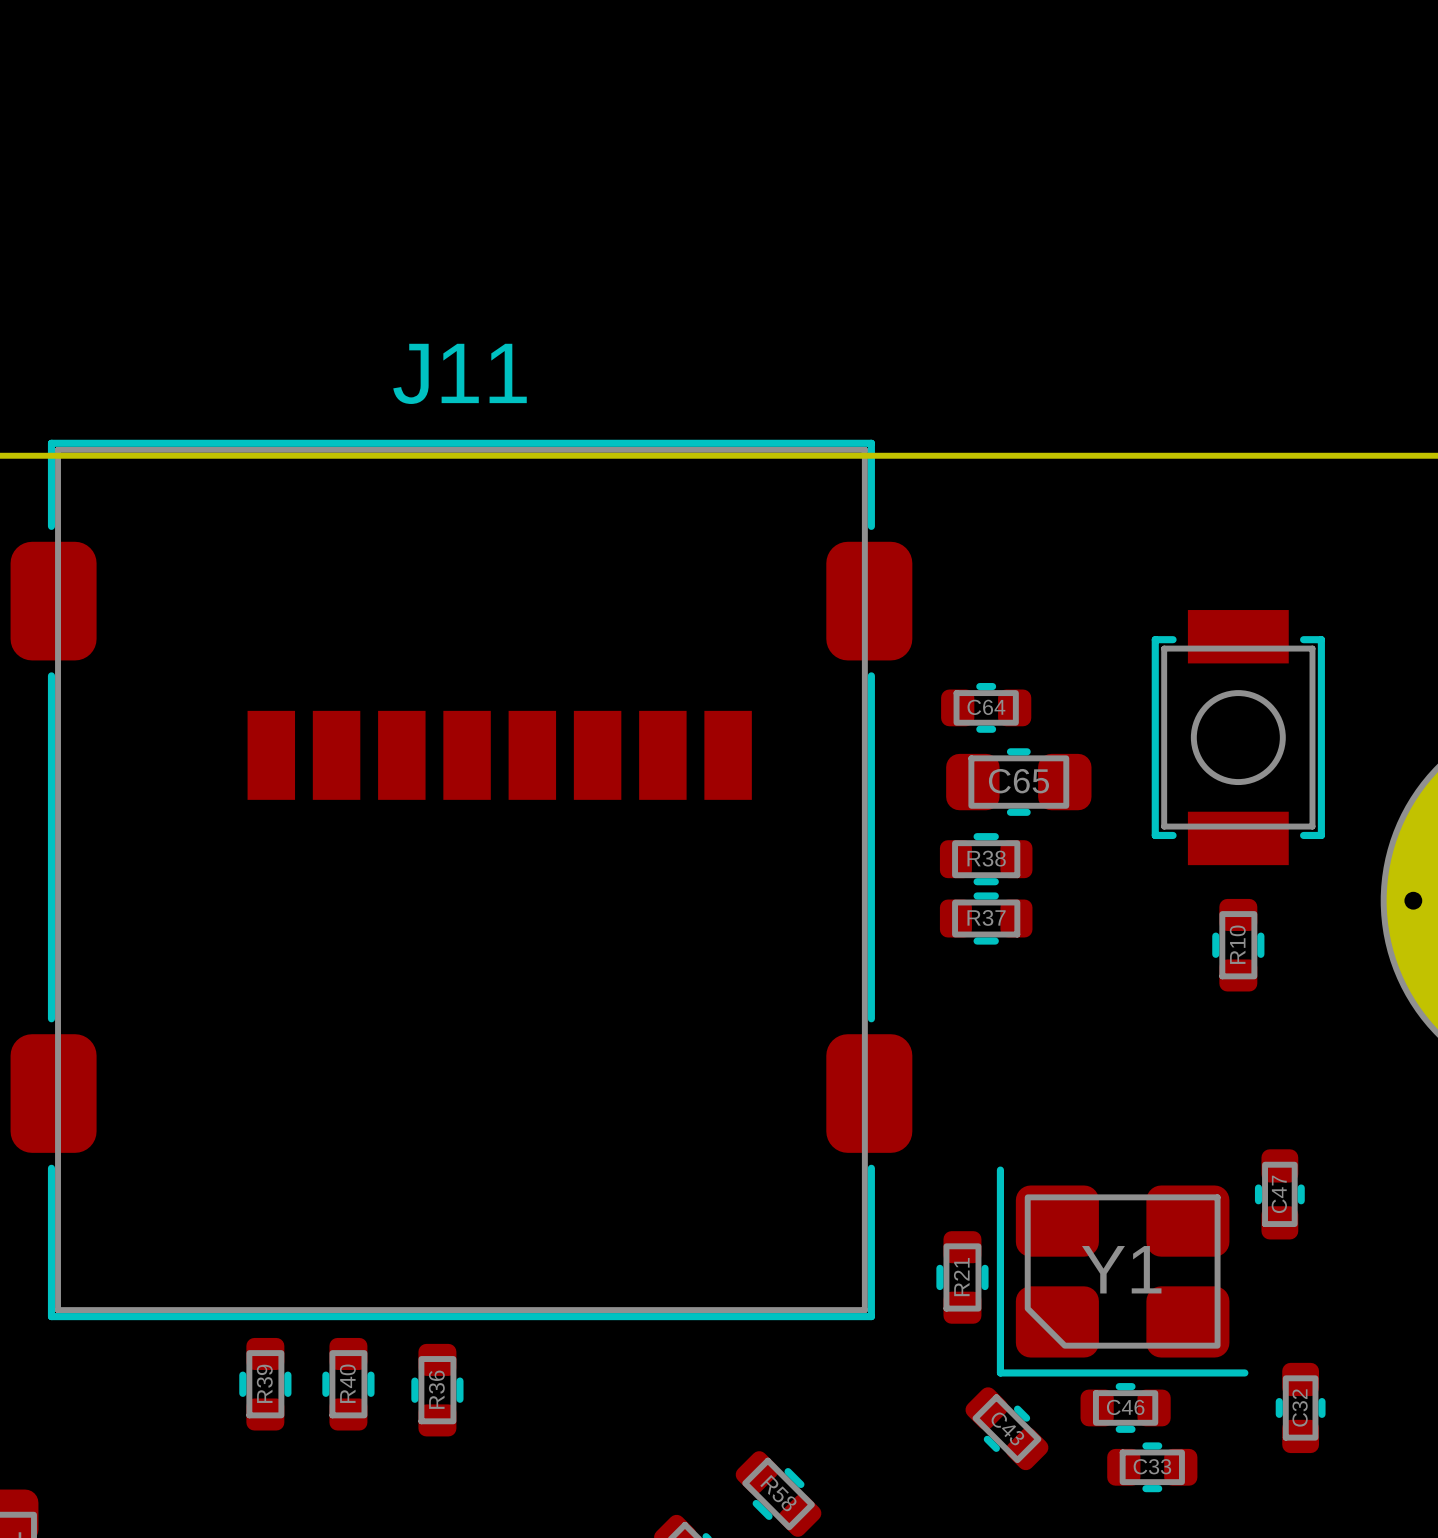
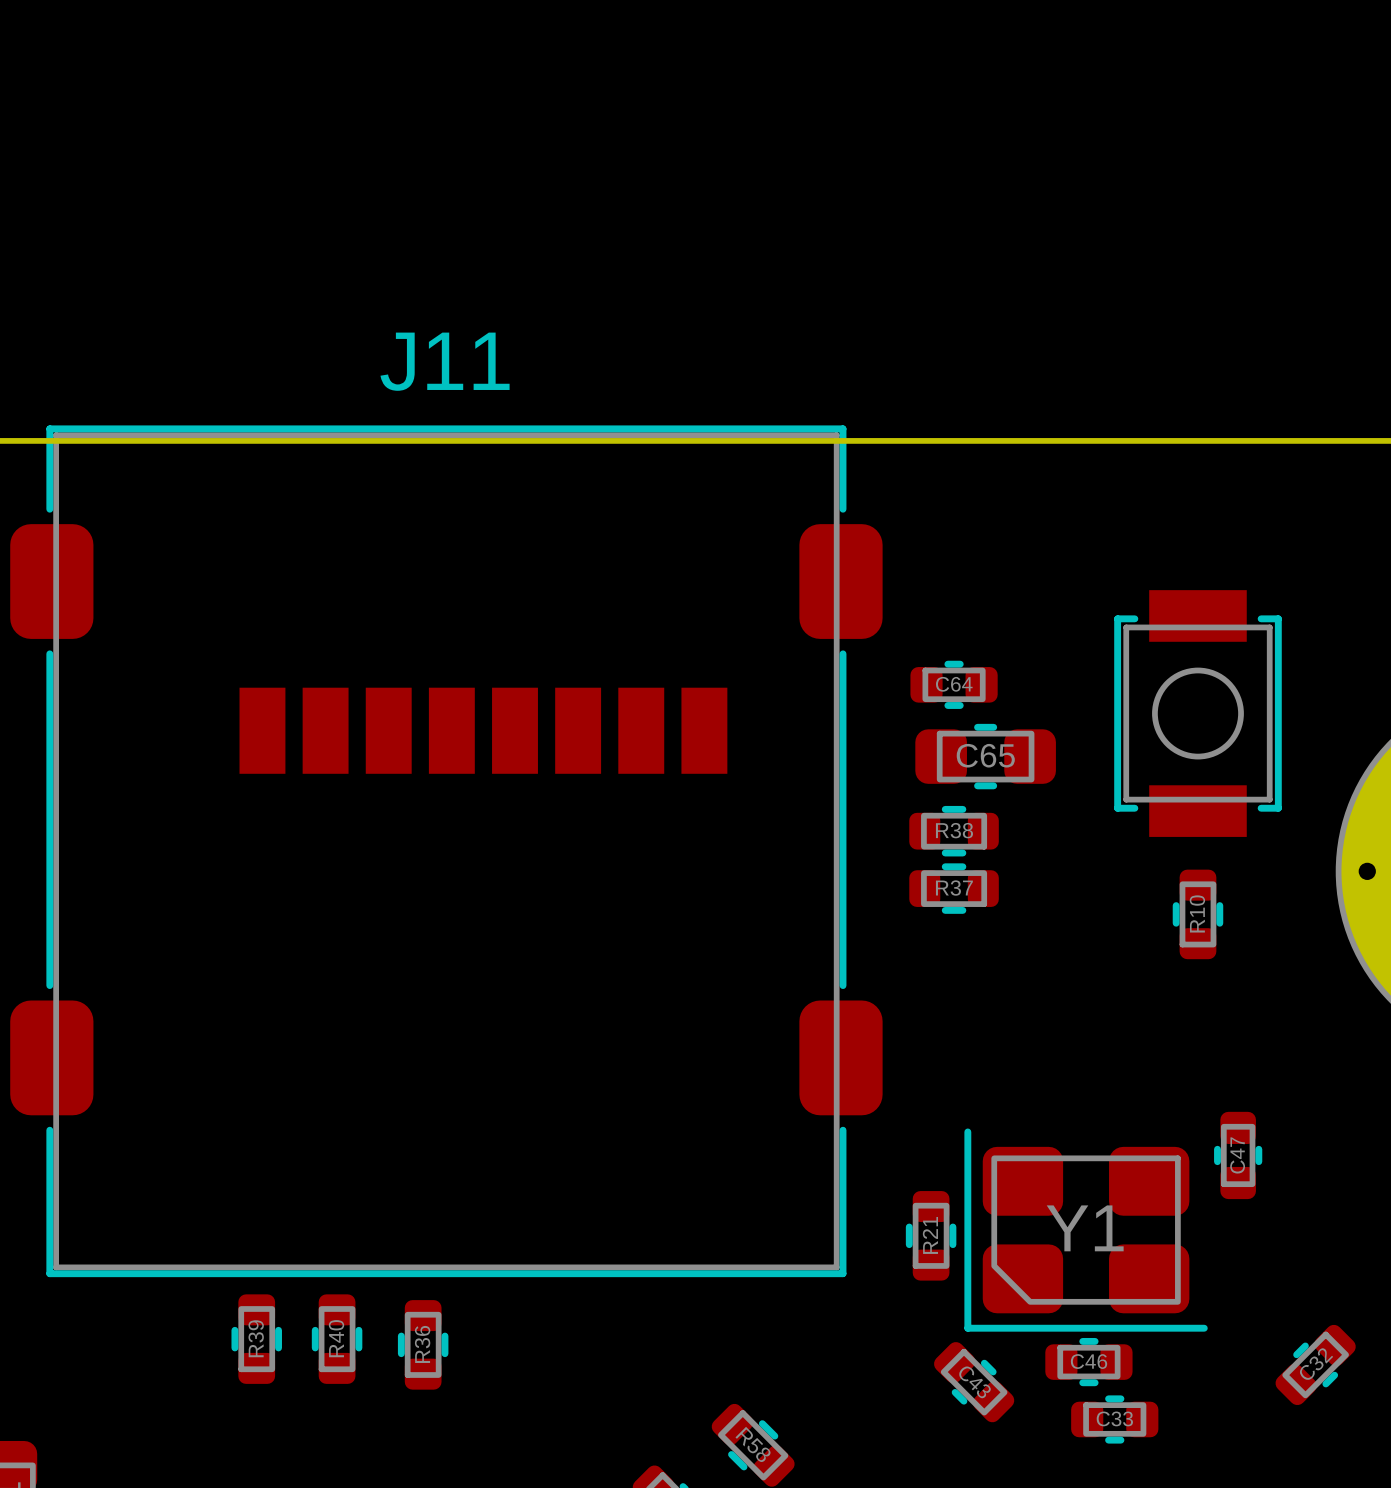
C32 rotation: 0° (1300, 1407) -> 45° clockwise (1315, 1364)
C32 position: (1300, 1407) -> (1315, 1364)

